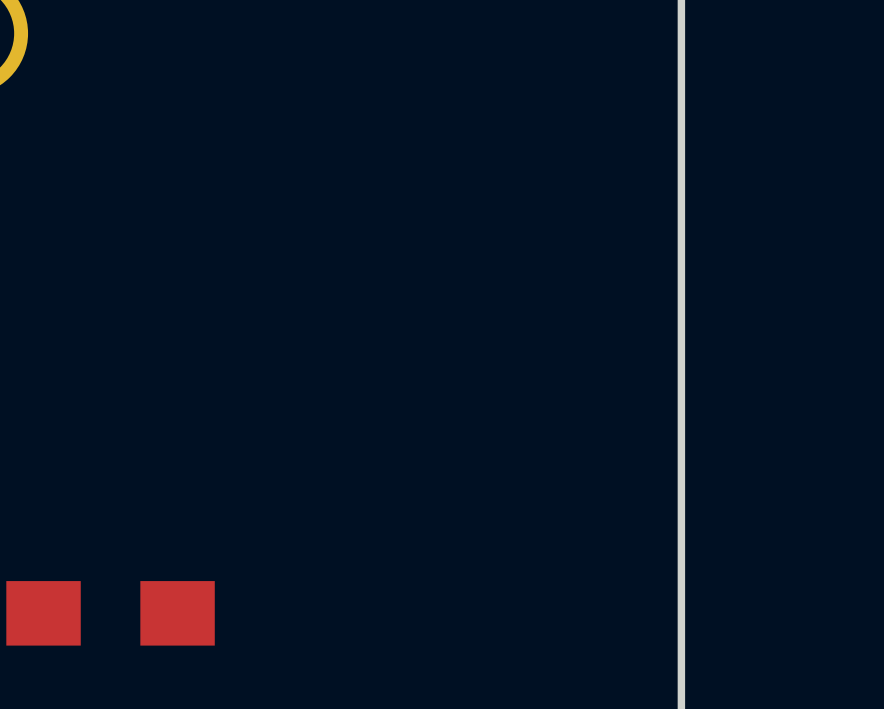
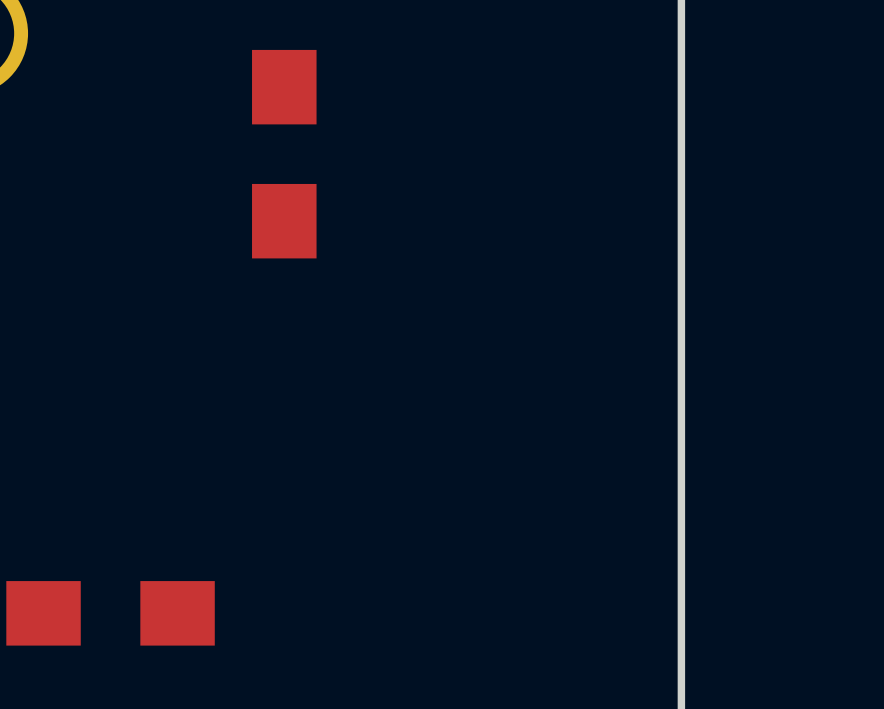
part: none -> (284, 154)

